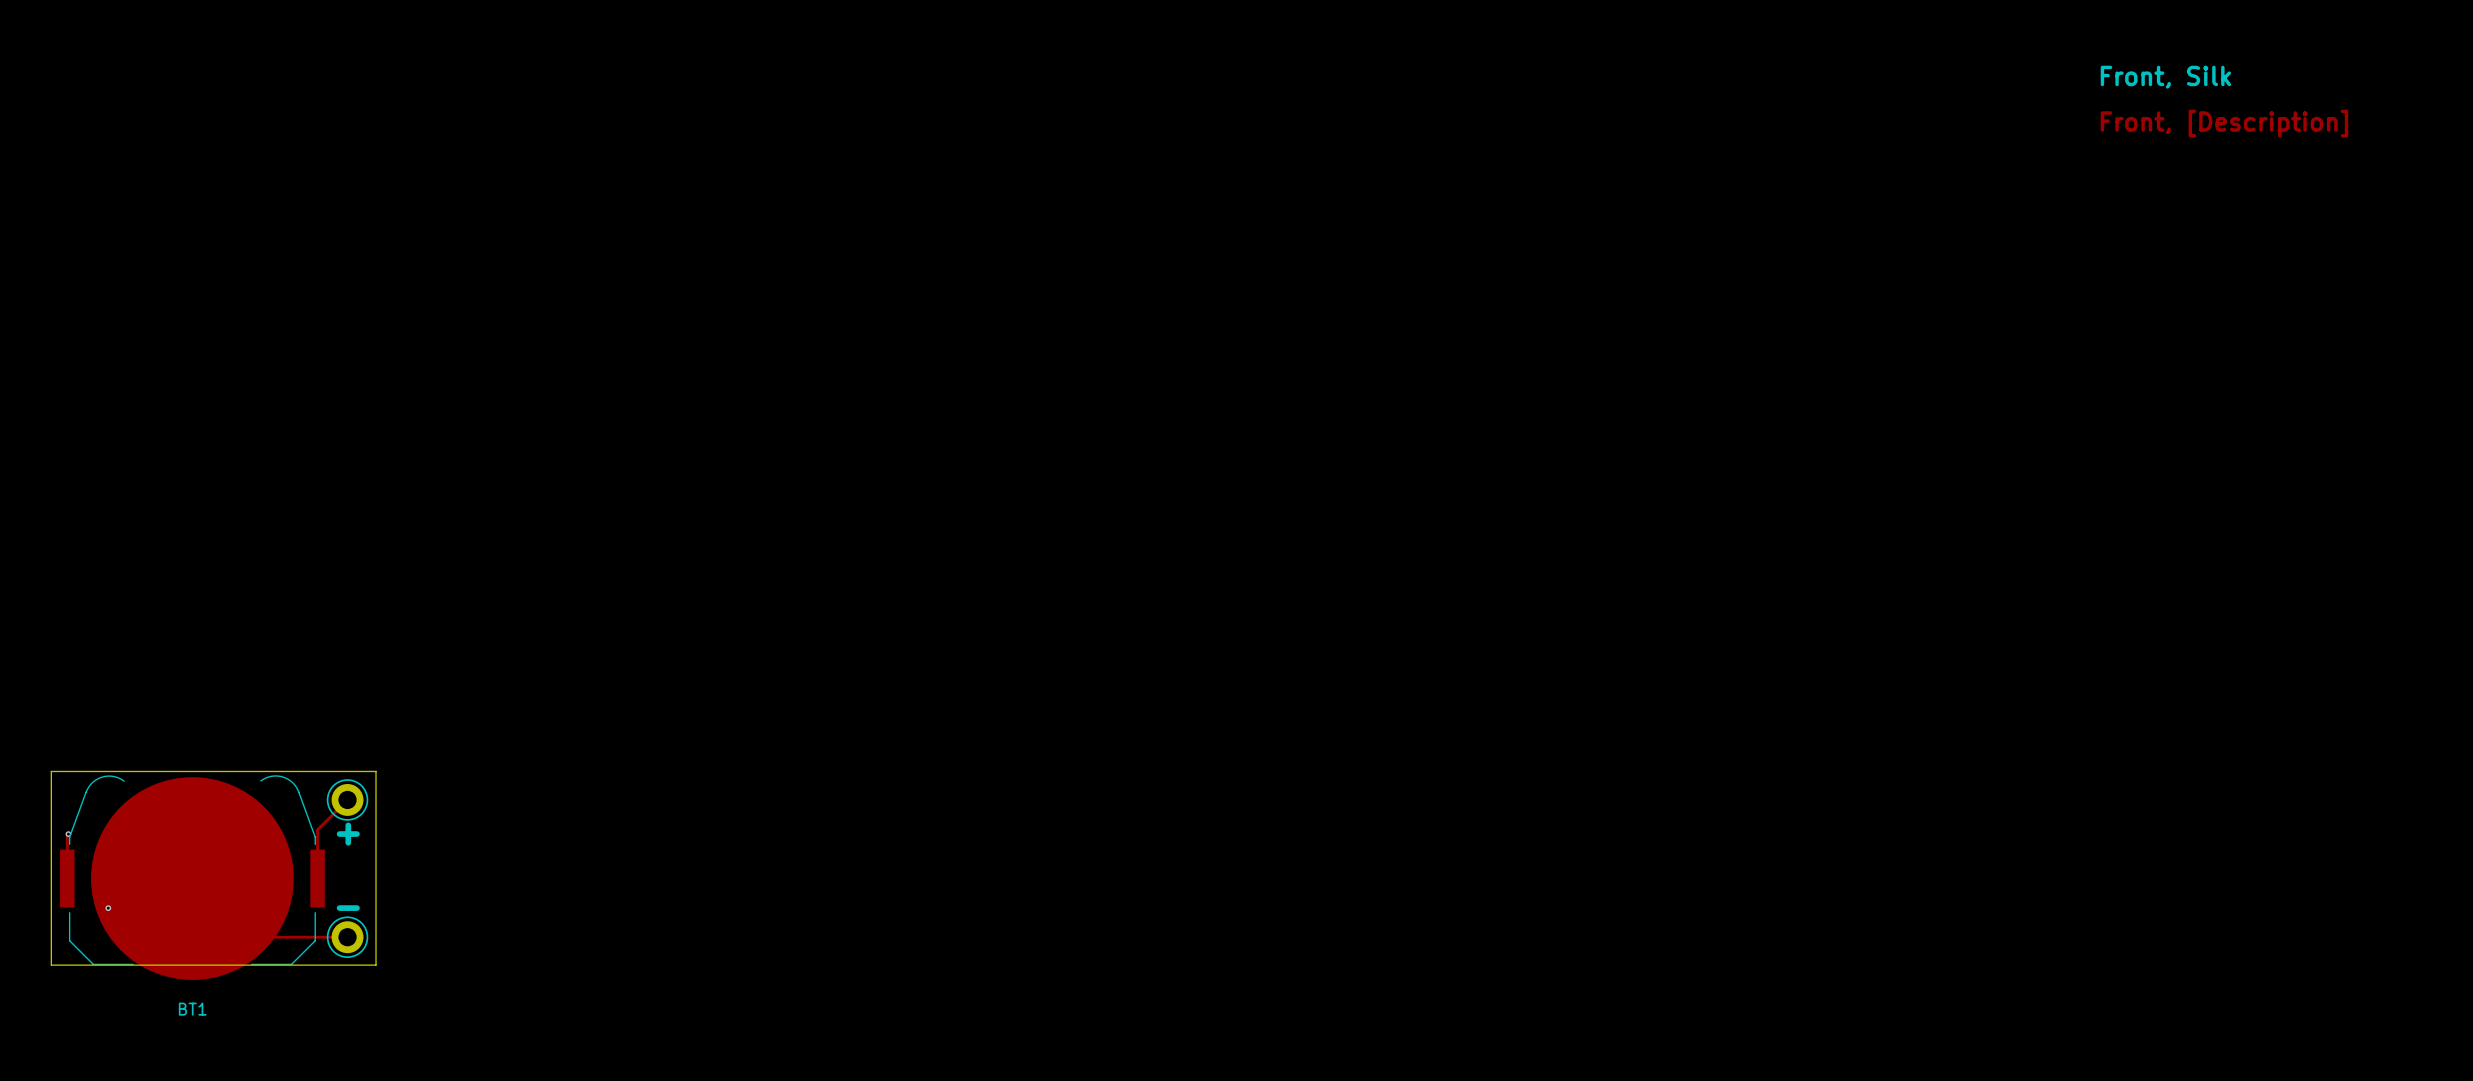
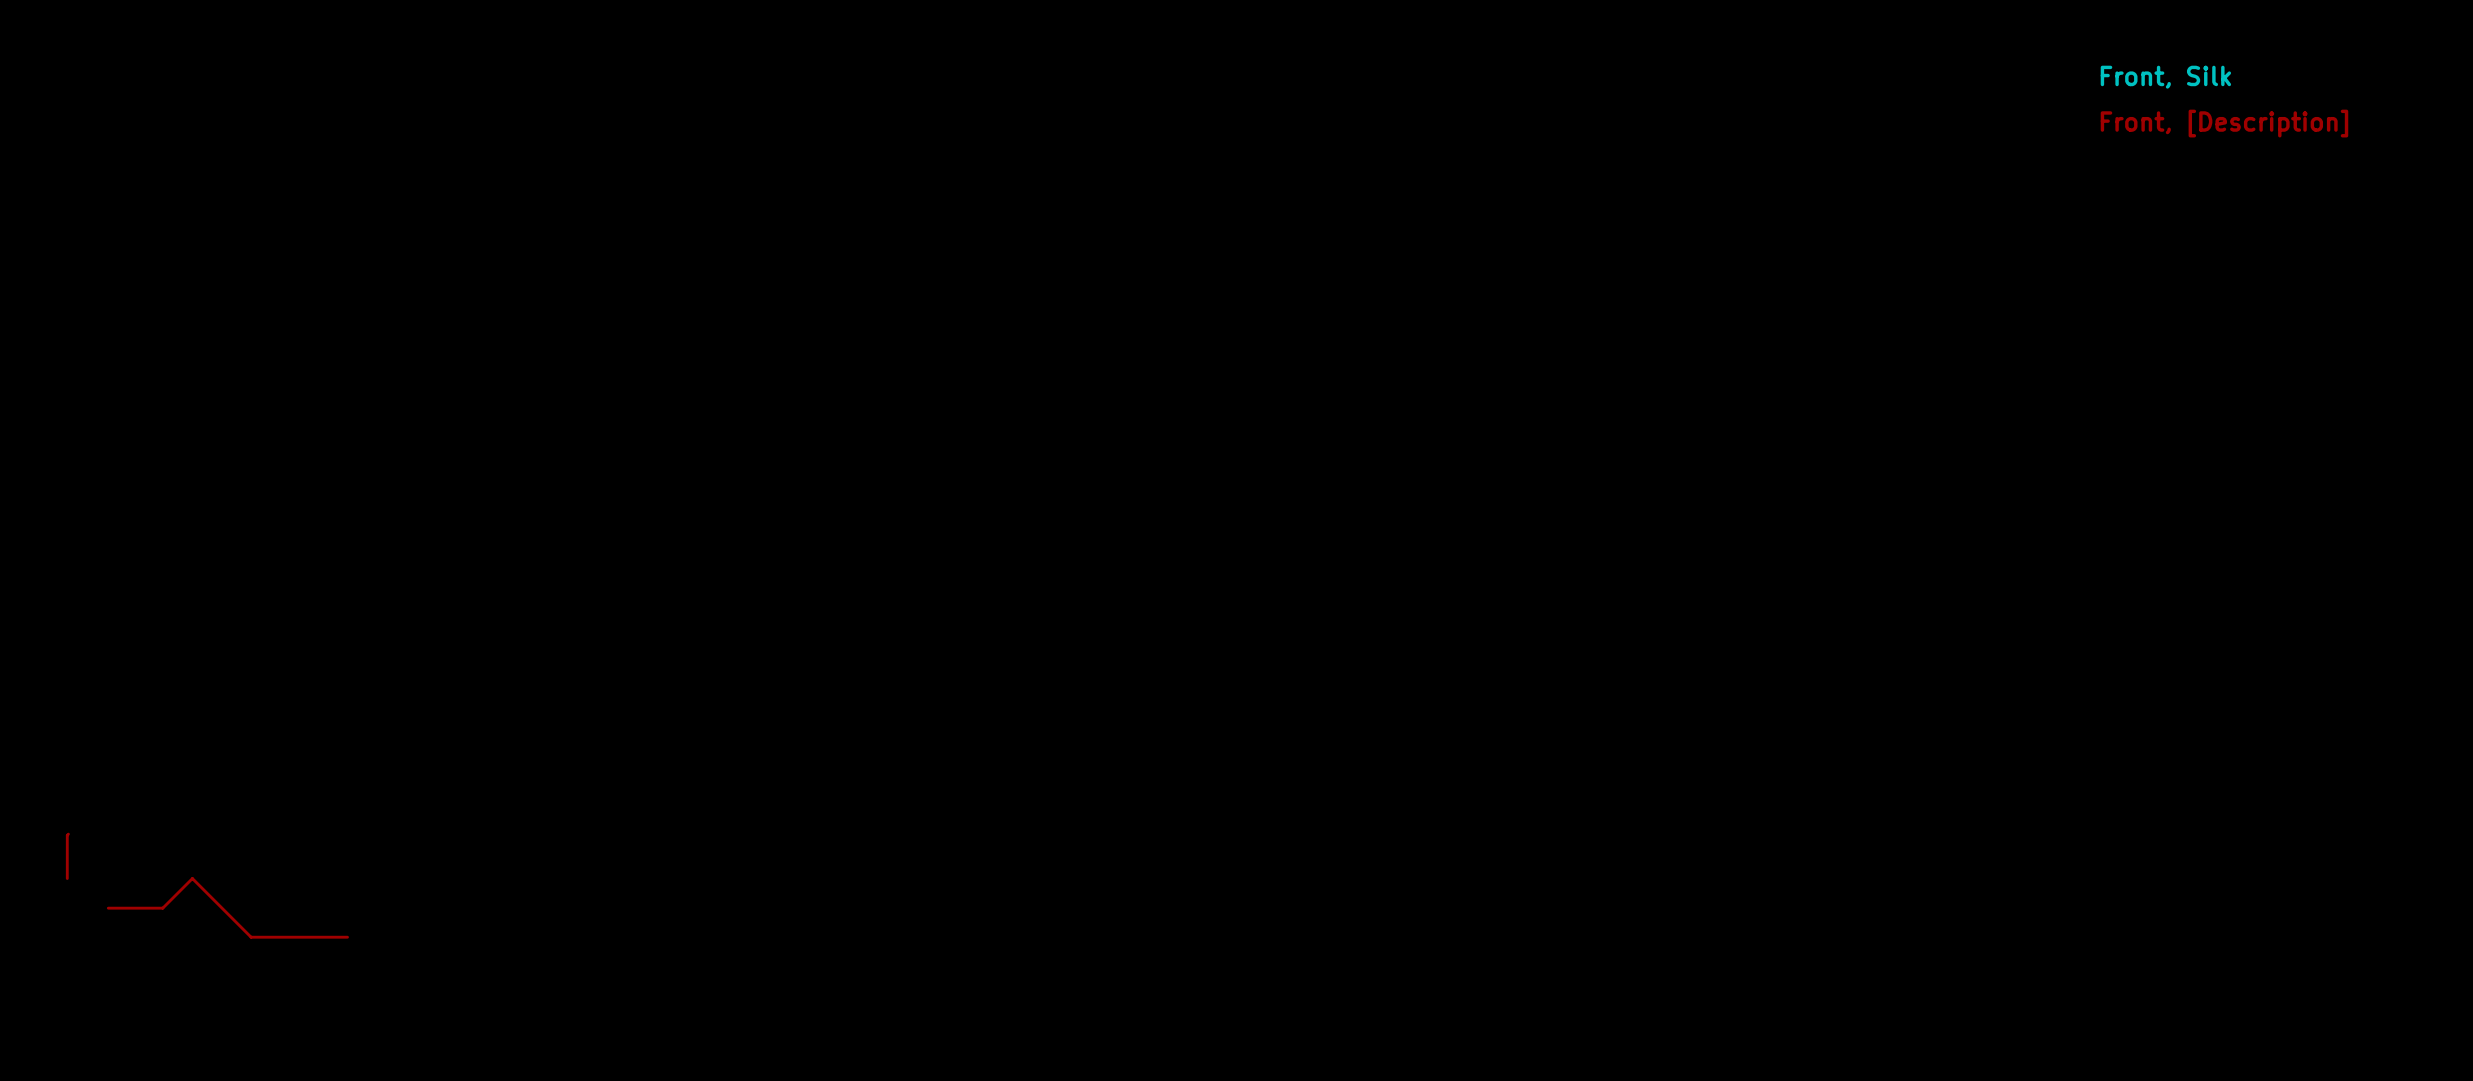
board edge: (51, 771) (376, 771) (376, 965) (51, 965) (51, 771) -> none
track: (347, 799) (317, 829) (317, 878) -> none
part: (347, 799) -> none
via: (68, 834) -> none
text: + (348, 834) -> none
BT1: (192, 877) -> none
via: (108, 908) -> none
text: - (348, 908) -> none
part: (347, 937) -> none

